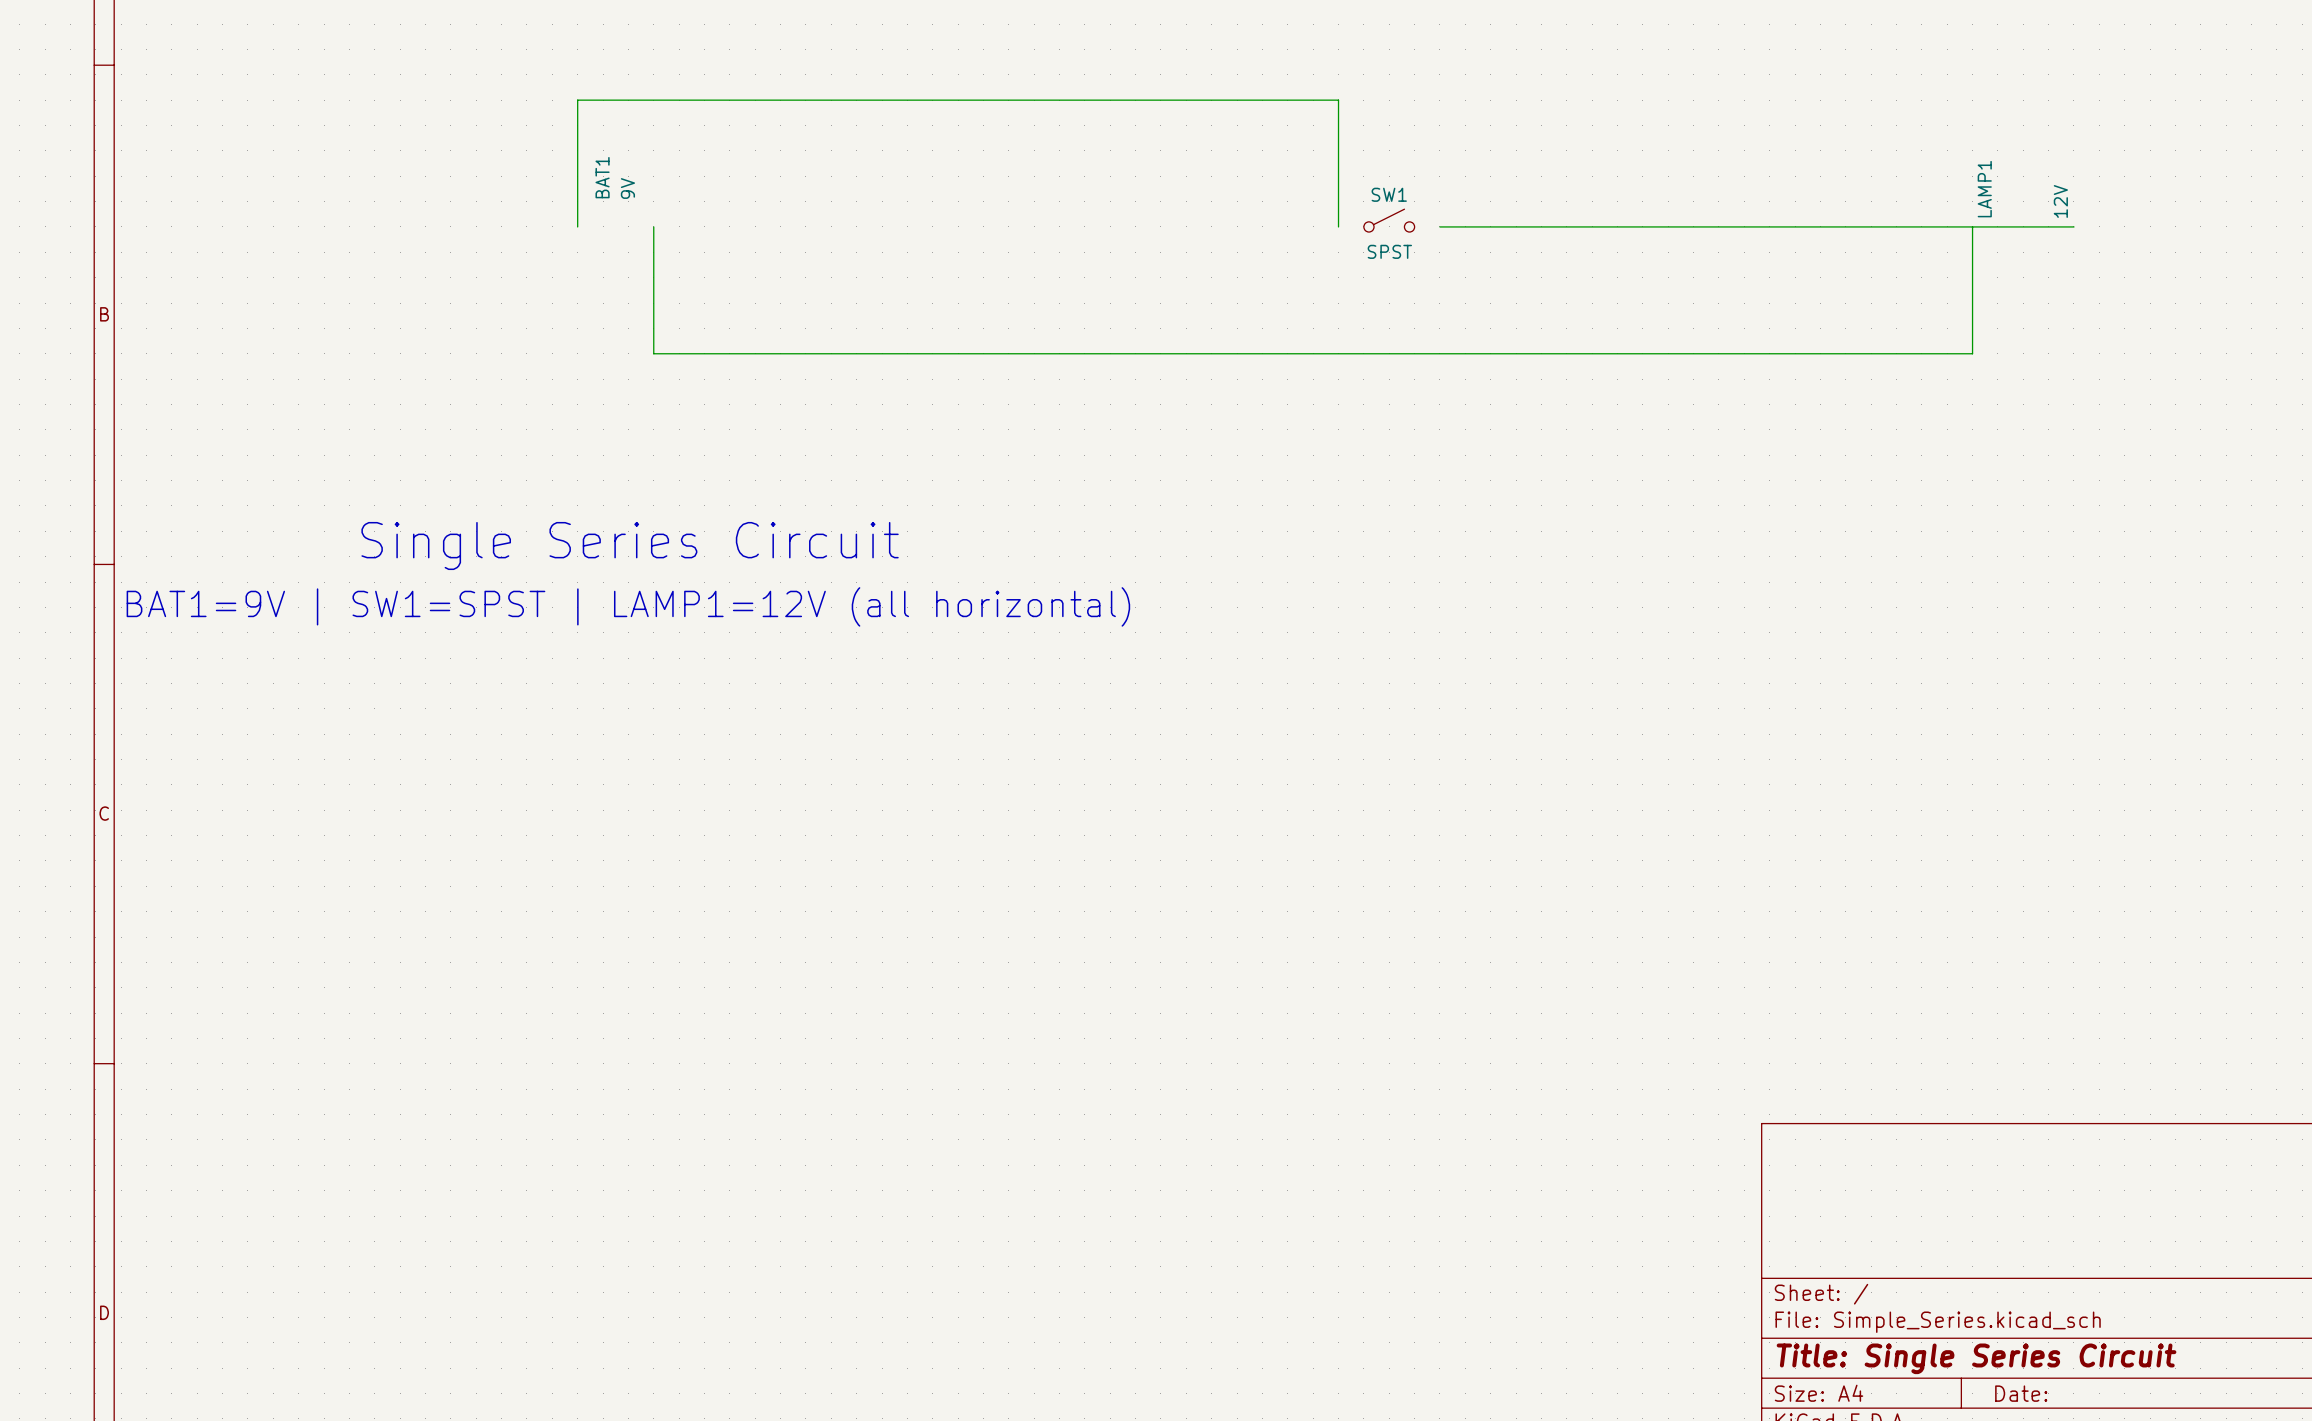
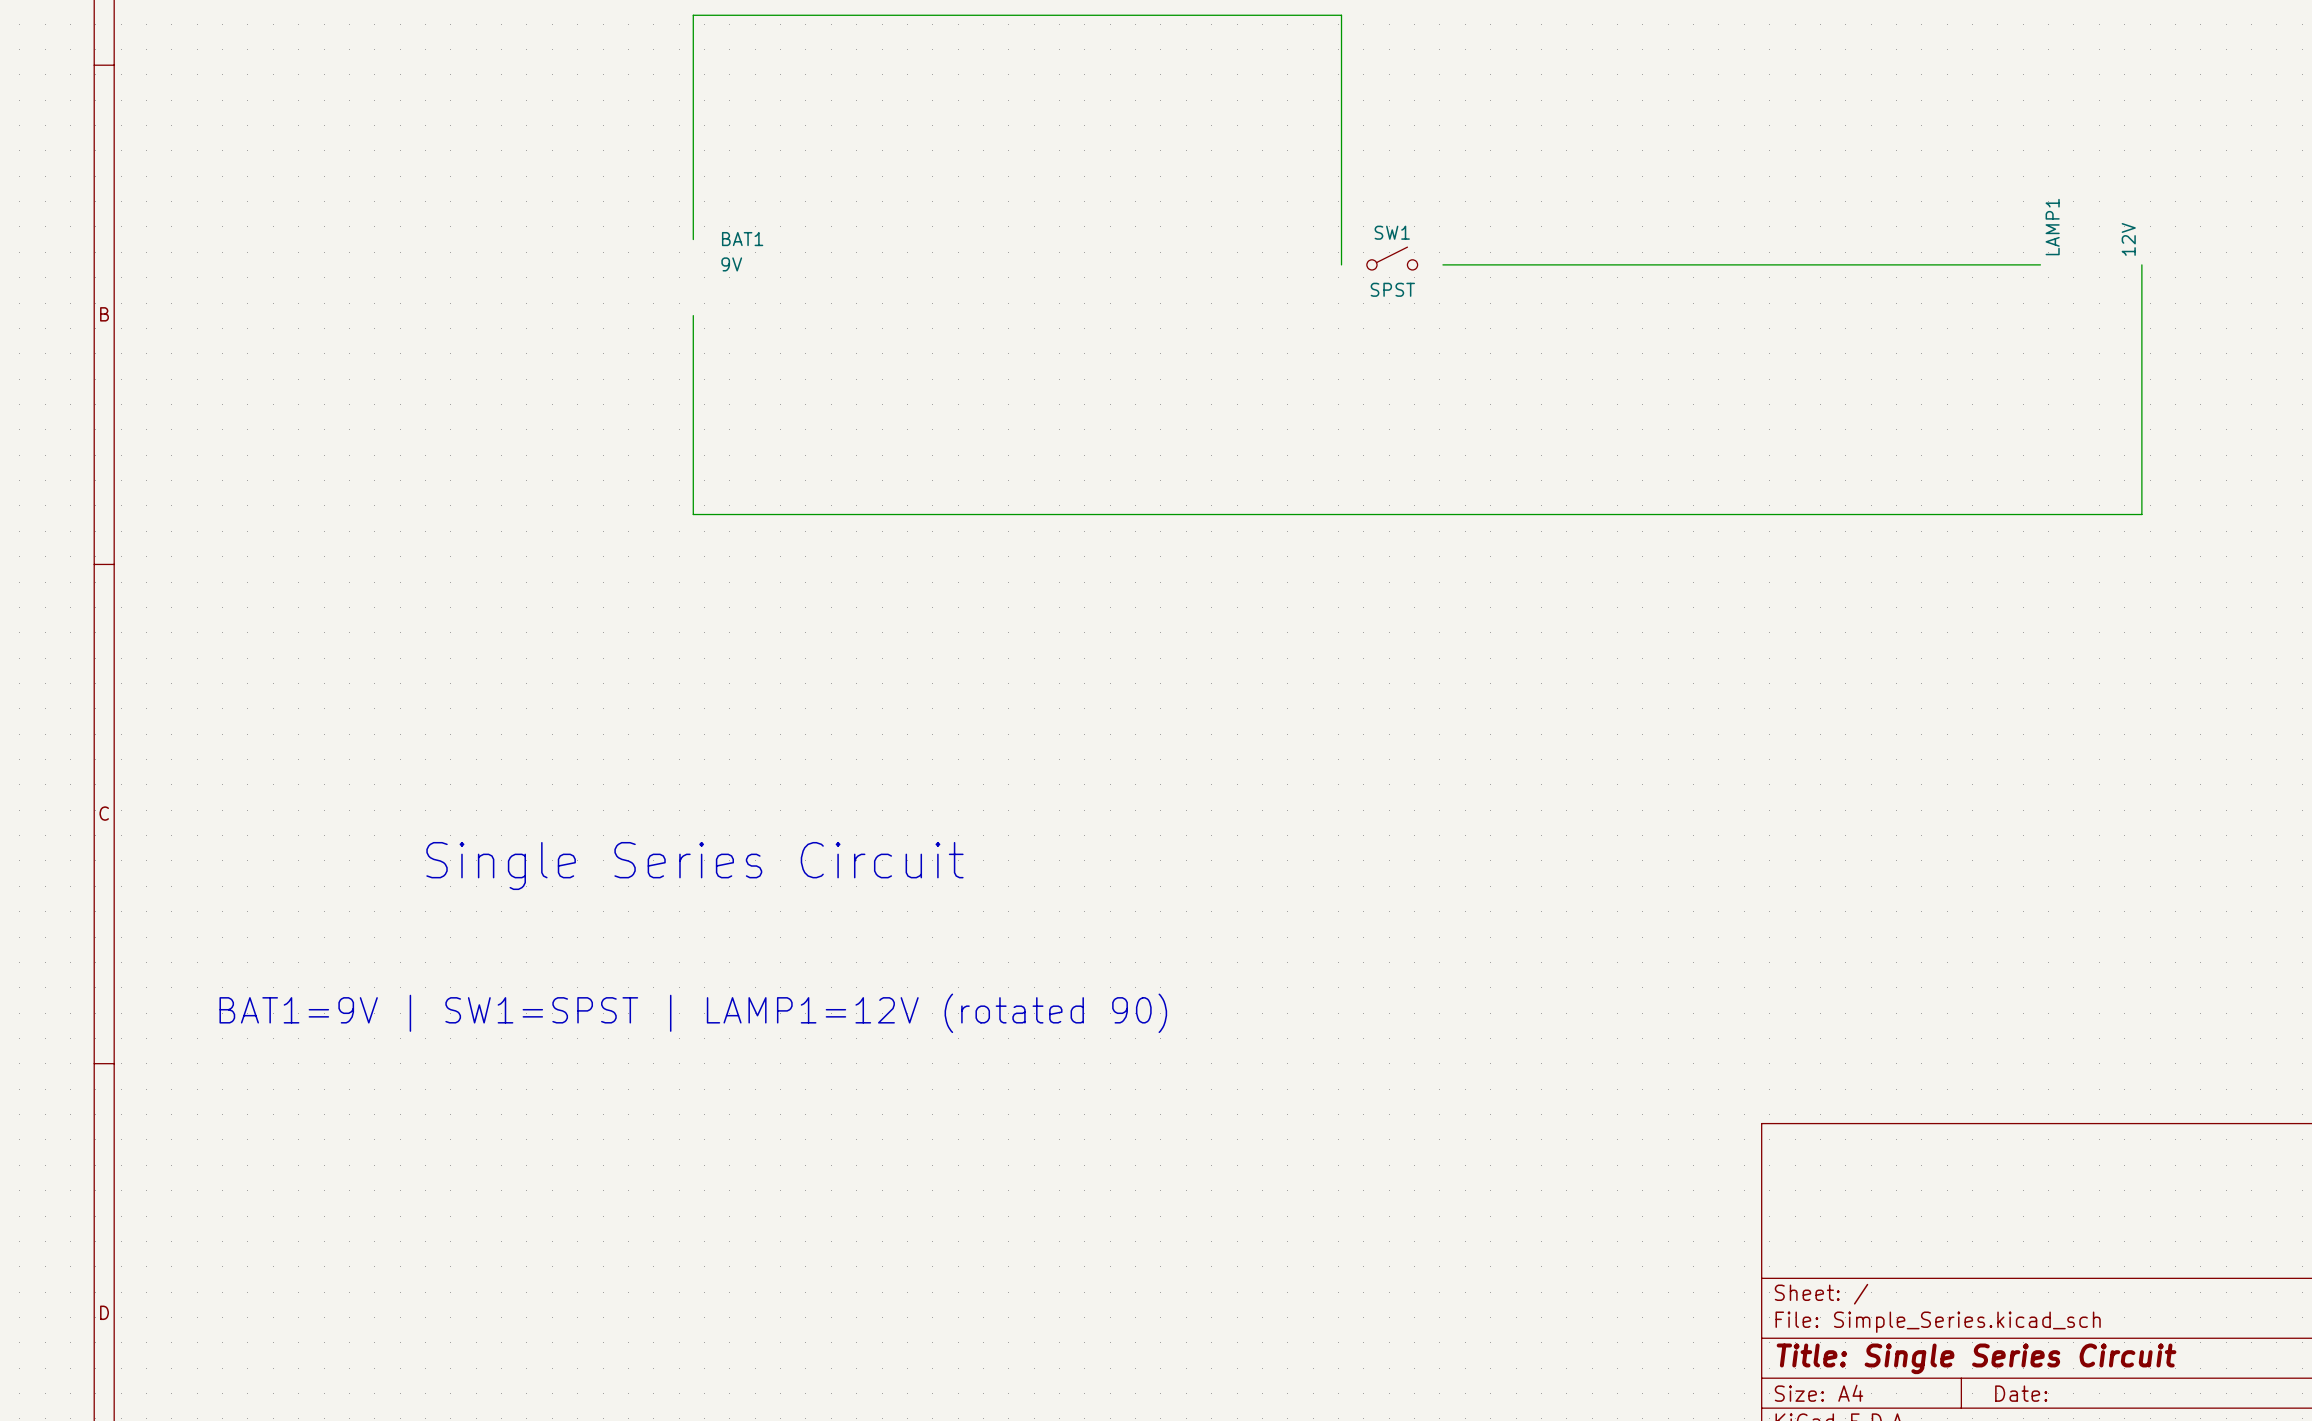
BAT1 name rotation: 0° (602, 177) -> 90° clockwise (742, 239)
BAT1 position: (615, 177) -> (742, 251)
BAT1 value rotation: 0° (627, 188) -> 90° clockwise (731, 264)
LAMP1 position: (2022, 189) -> (2090, 227)
SW1 position: (1389, 220) -> (1392, 258)
wire: (577, 226) (577, 100) (1338, 100) (1338, 226) -> none
wire: (653, 226) (653, 353) (1972, 353) (1972, 226) -> none
wire: (1439, 226) (2073, 226) -> none
wire: none -> (693, 239) (693, 15) (1341, 15) (1341, 264)
wire: none -> (1442, 264) (2040, 264)
wire: none -> (2141, 264) (2141, 514) (693, 514) (693, 315)
text: Single Series Circuit (630, 545) -> none
text: BAT1=9V | SW1=SPST | LAMP1=12V (all horizontal) (628, 606) -> none
text: none -> Single Series Circuit (694, 866)
text: none -> BAT1=9V | SW1=SPST | LAMP1=12V (rotated 90) (693, 1013)

